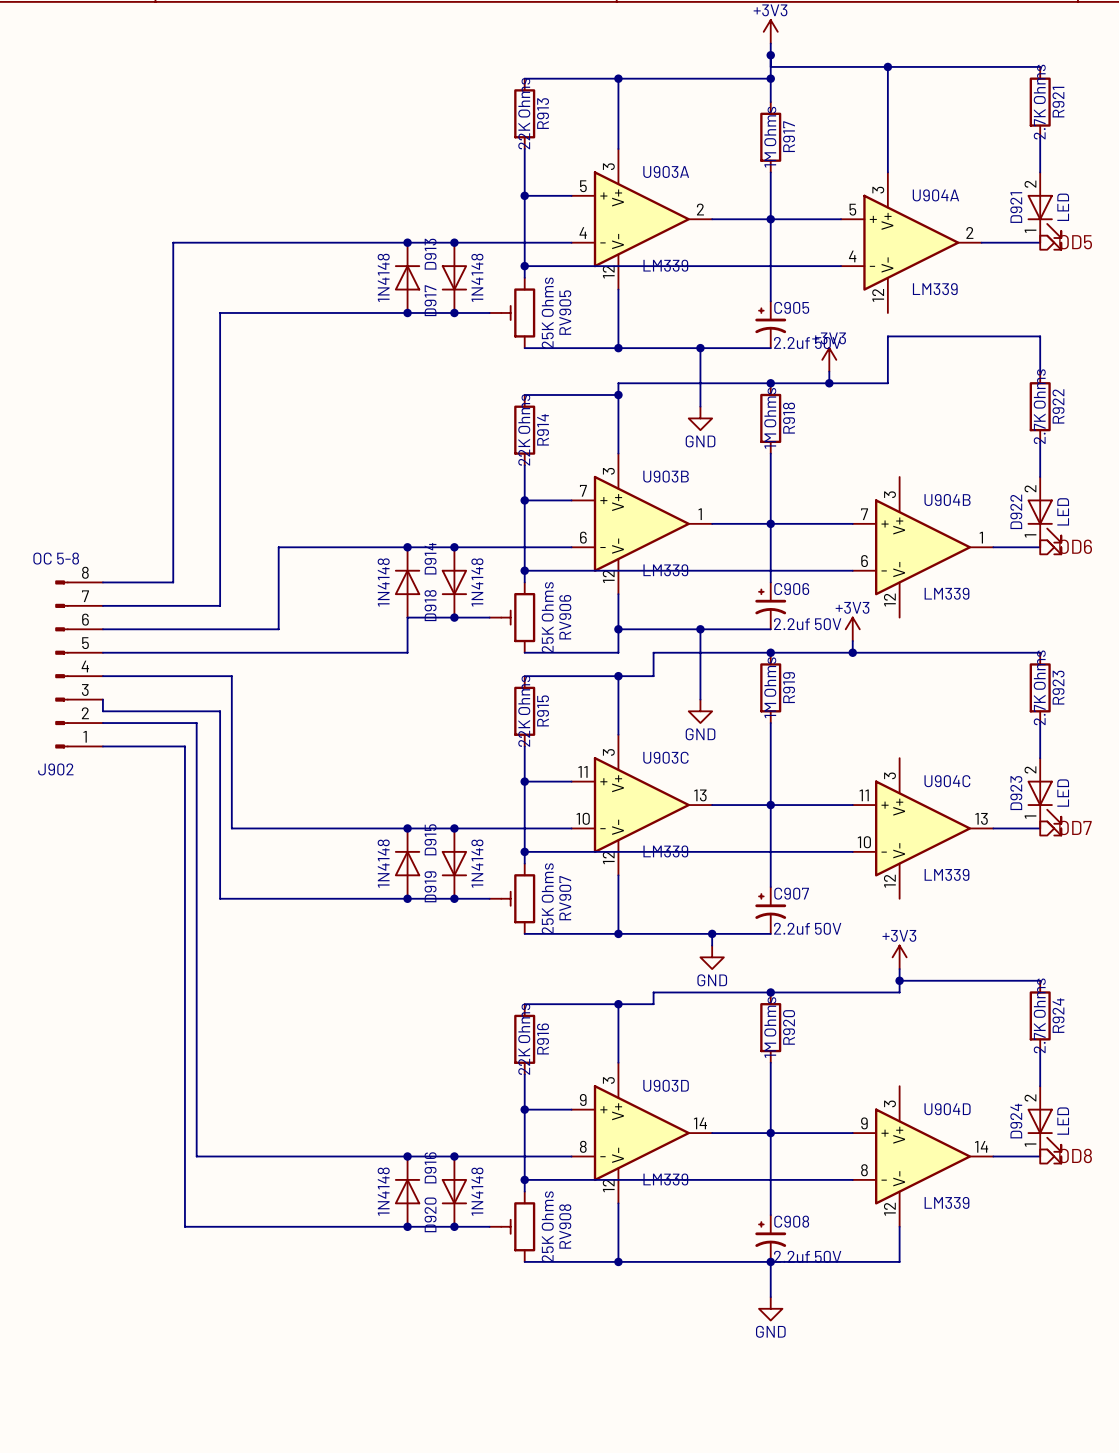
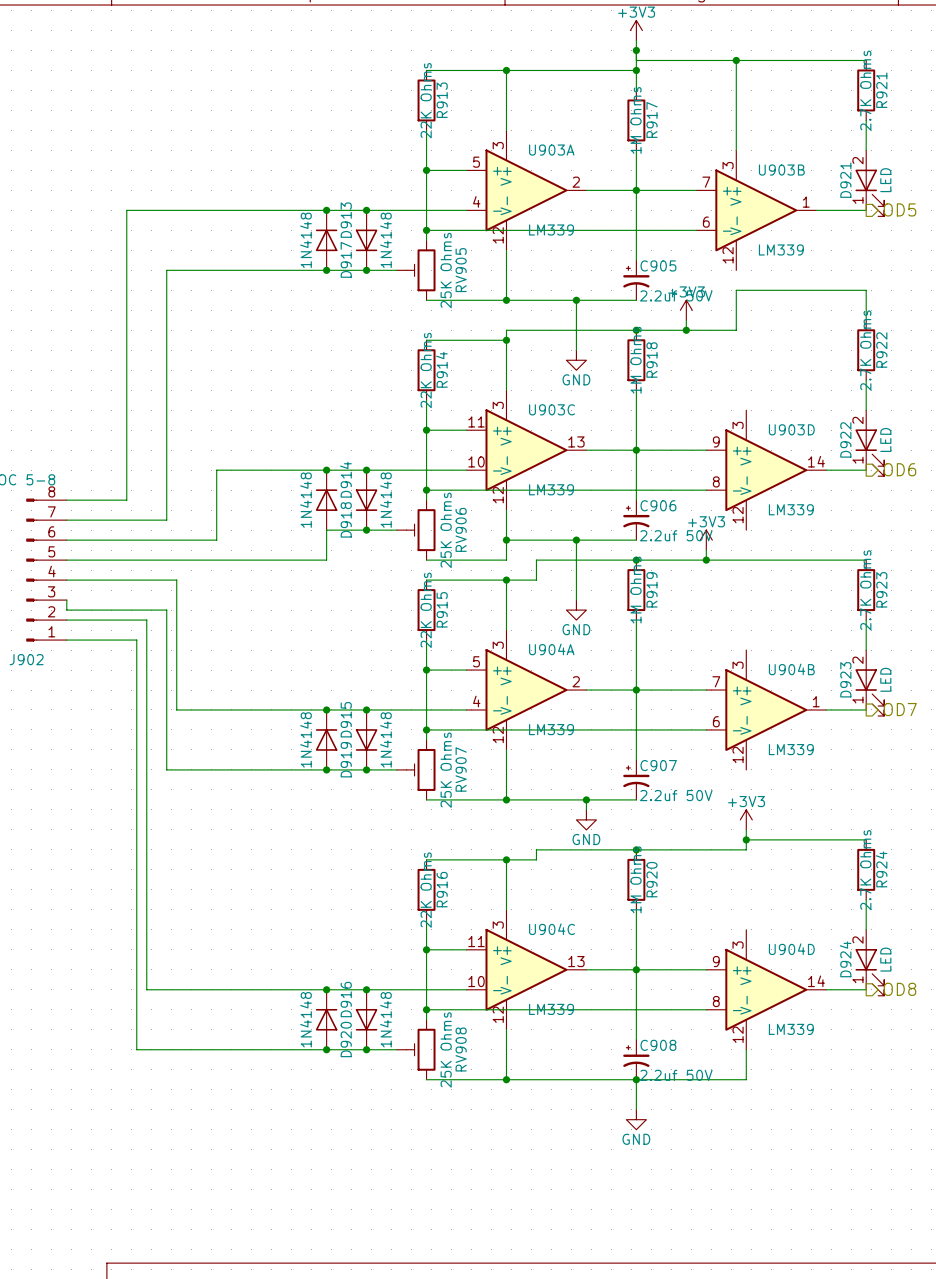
U904A position: (911, 242) -> (526, 690)
U903B position: (641, 523) -> (756, 210)
U904B position: (923, 547) -> (766, 709)
U903C position: (641, 805) -> (526, 450)
U904C position: (923, 828) -> (526, 969)
U903D position: (641, 1133) -> (766, 470)

